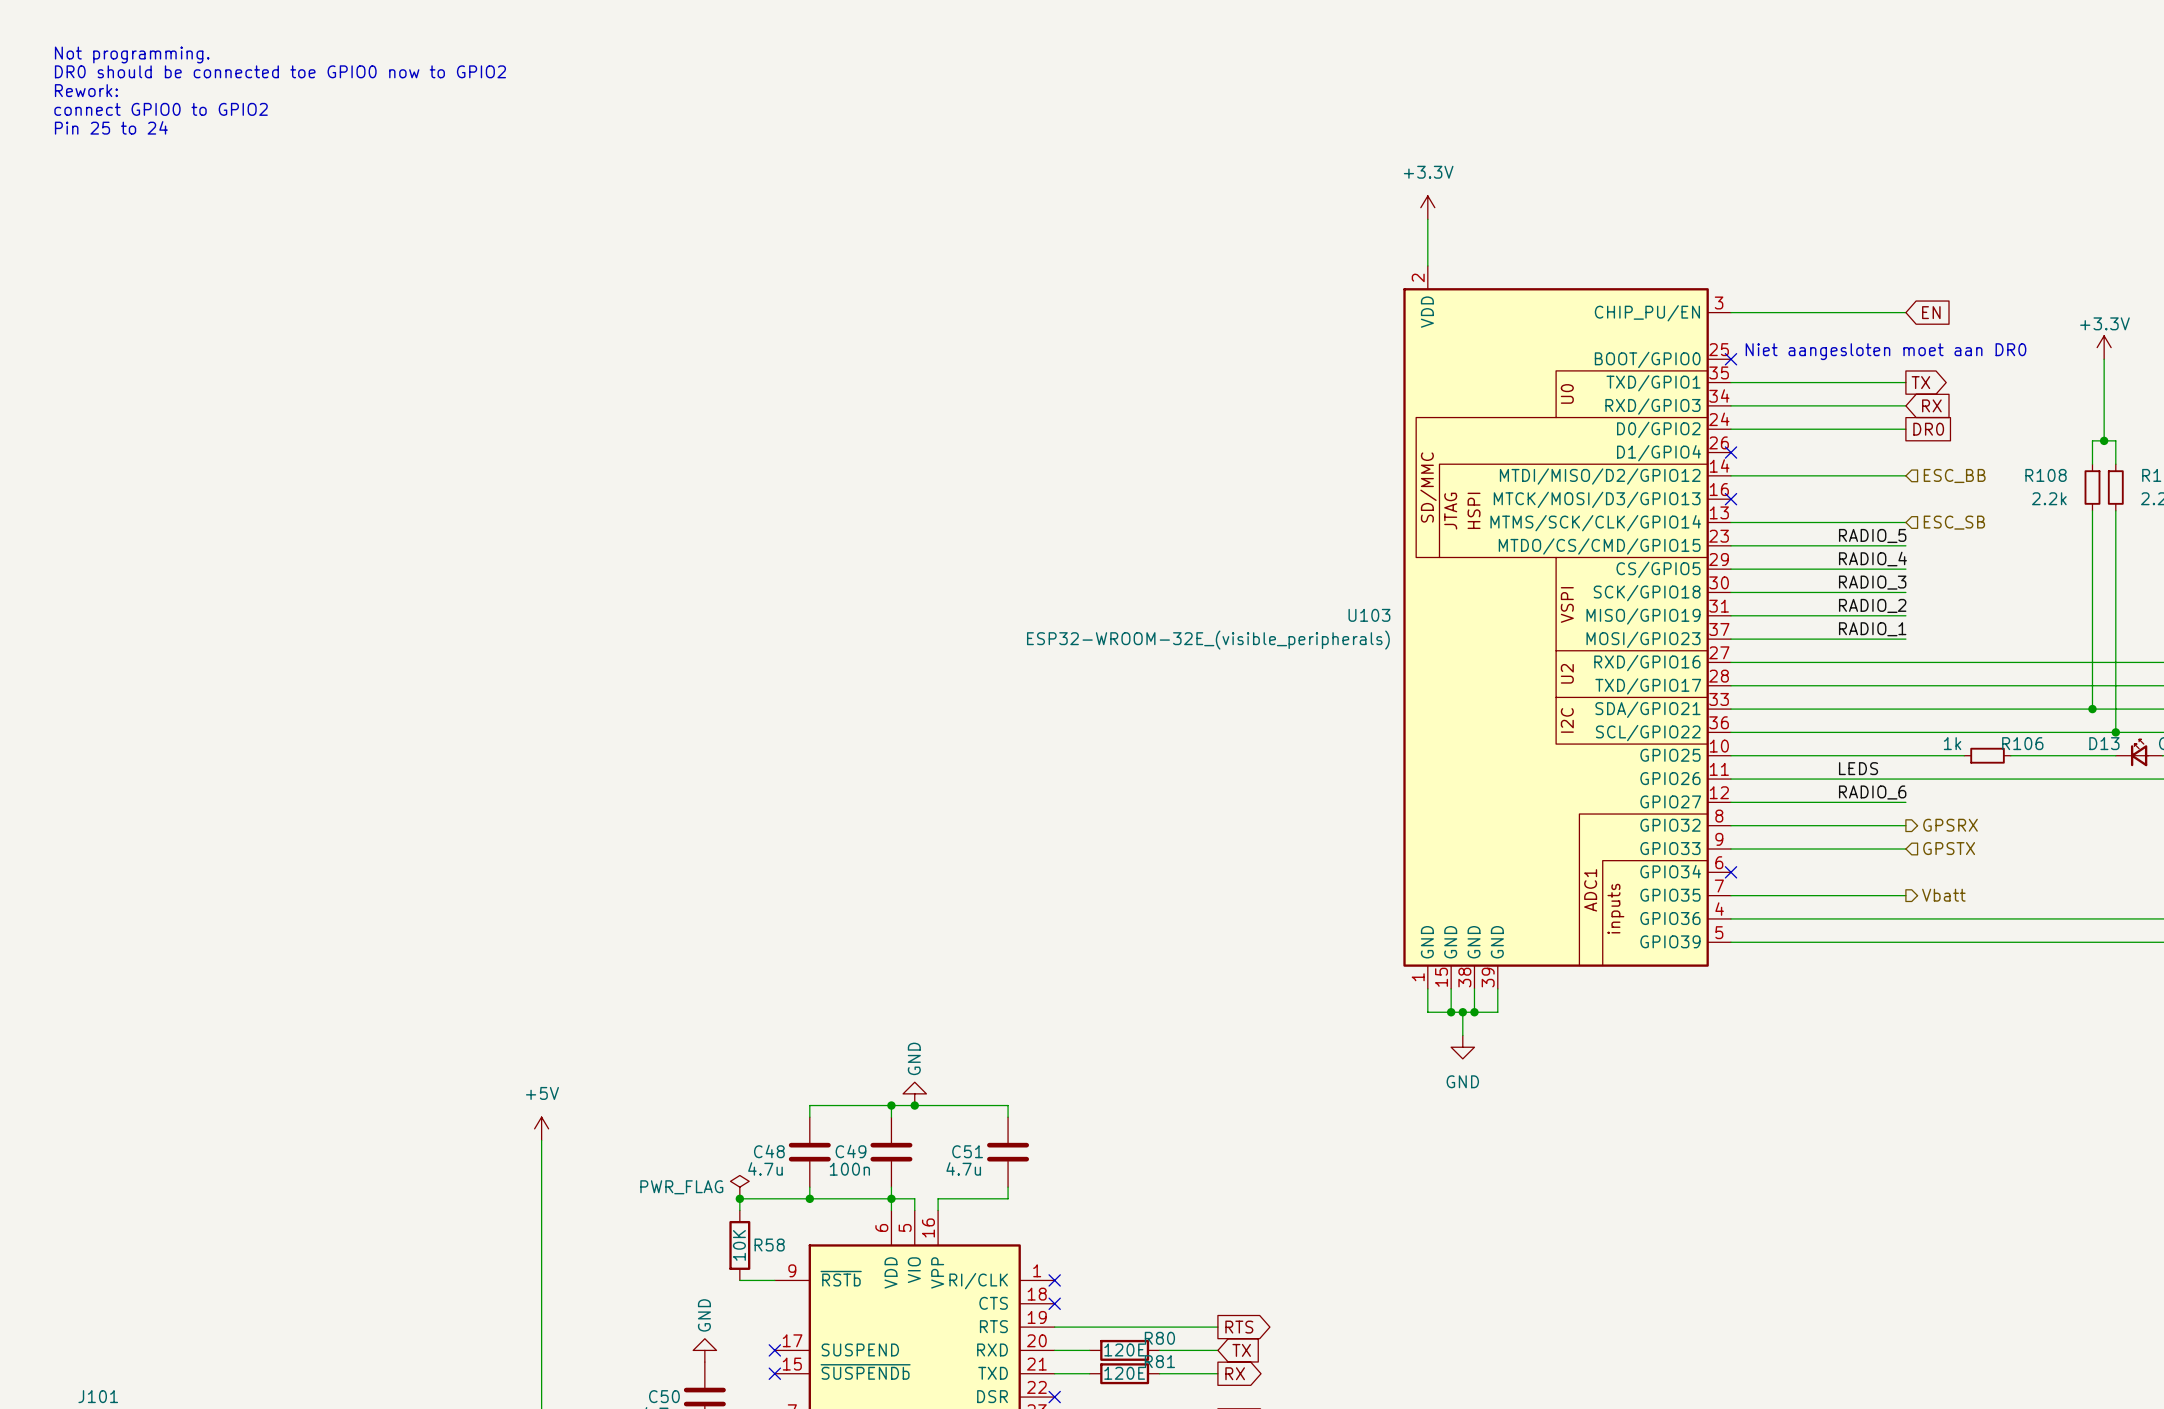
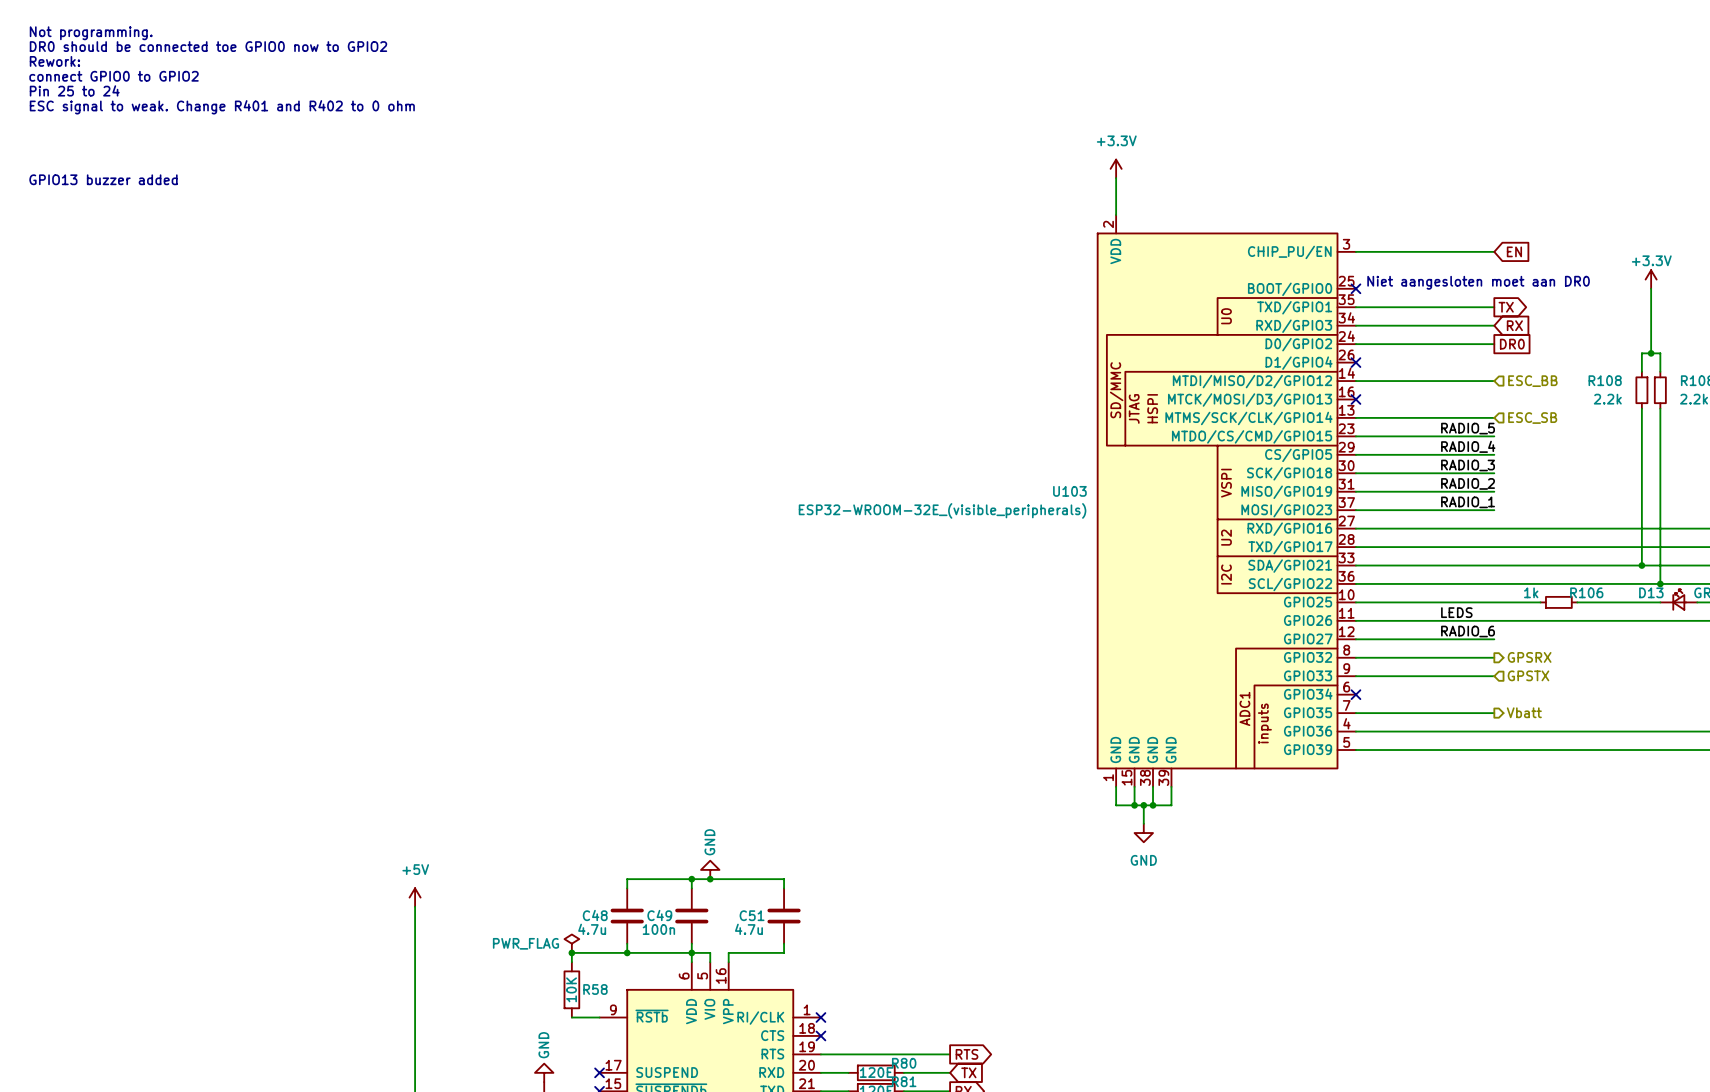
text: none -> Not programming. (91, 33)
text: Not programming. (132, 54) -> DR0 should be connected toe GPIO0 now to GPIO2 (208, 46)
text: DR0 should be connected toe GPIO0 now to GPIO2 (280, 71) -> Rework: (54, 61)
text: Rework: (86, 90) -> connect GPIO0 to GPIO2 (114, 76)
text: connect GPIO0 to GPIO2 (161, 109) -> Pin 25 to 24 (74, 90)
text: Pin 25 to 24 (111, 127) -> ESC signal to weak. Change R401 and R402 to 0 ohm (222, 107)
text: none -> GPIO13 buzzer added (103, 179)

